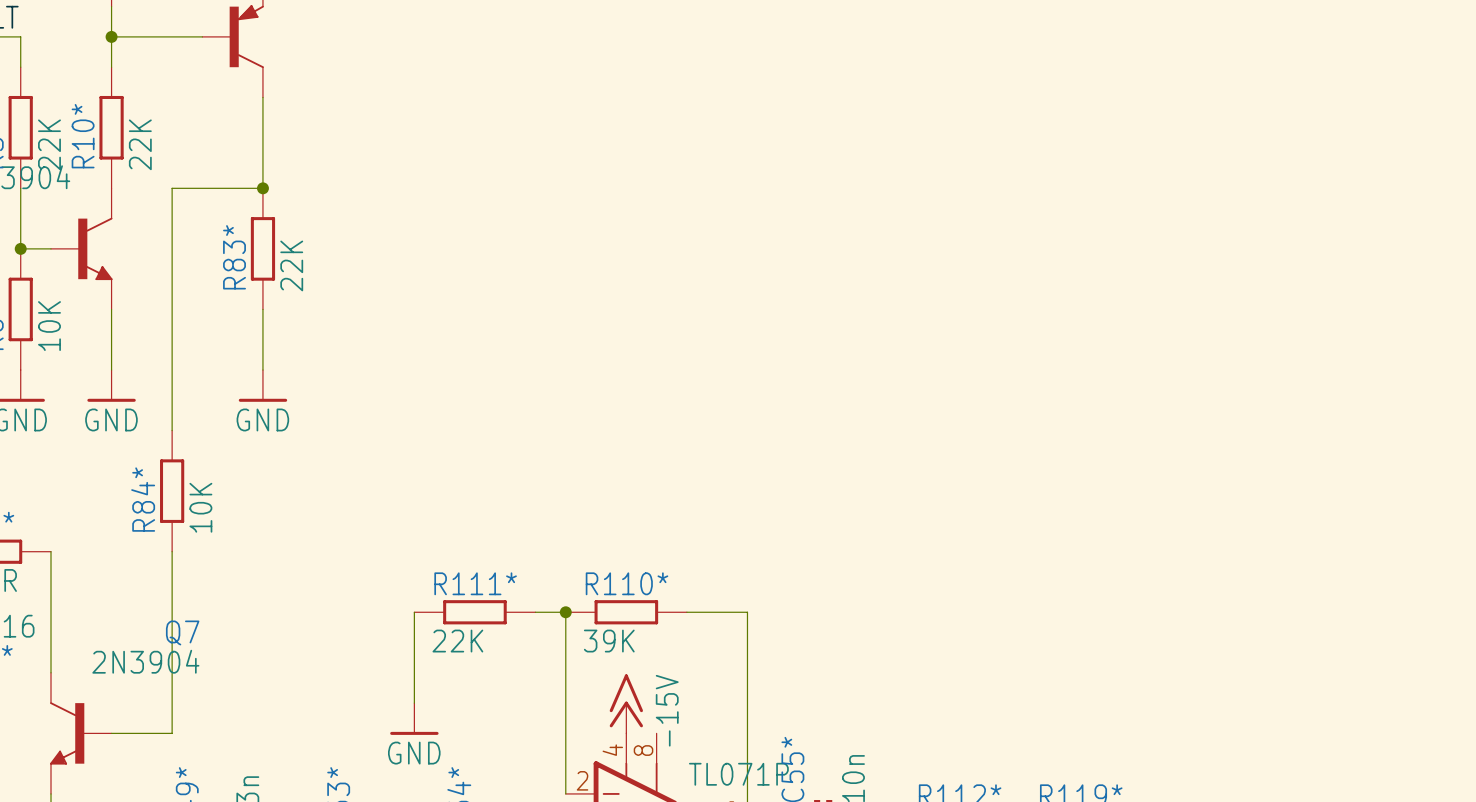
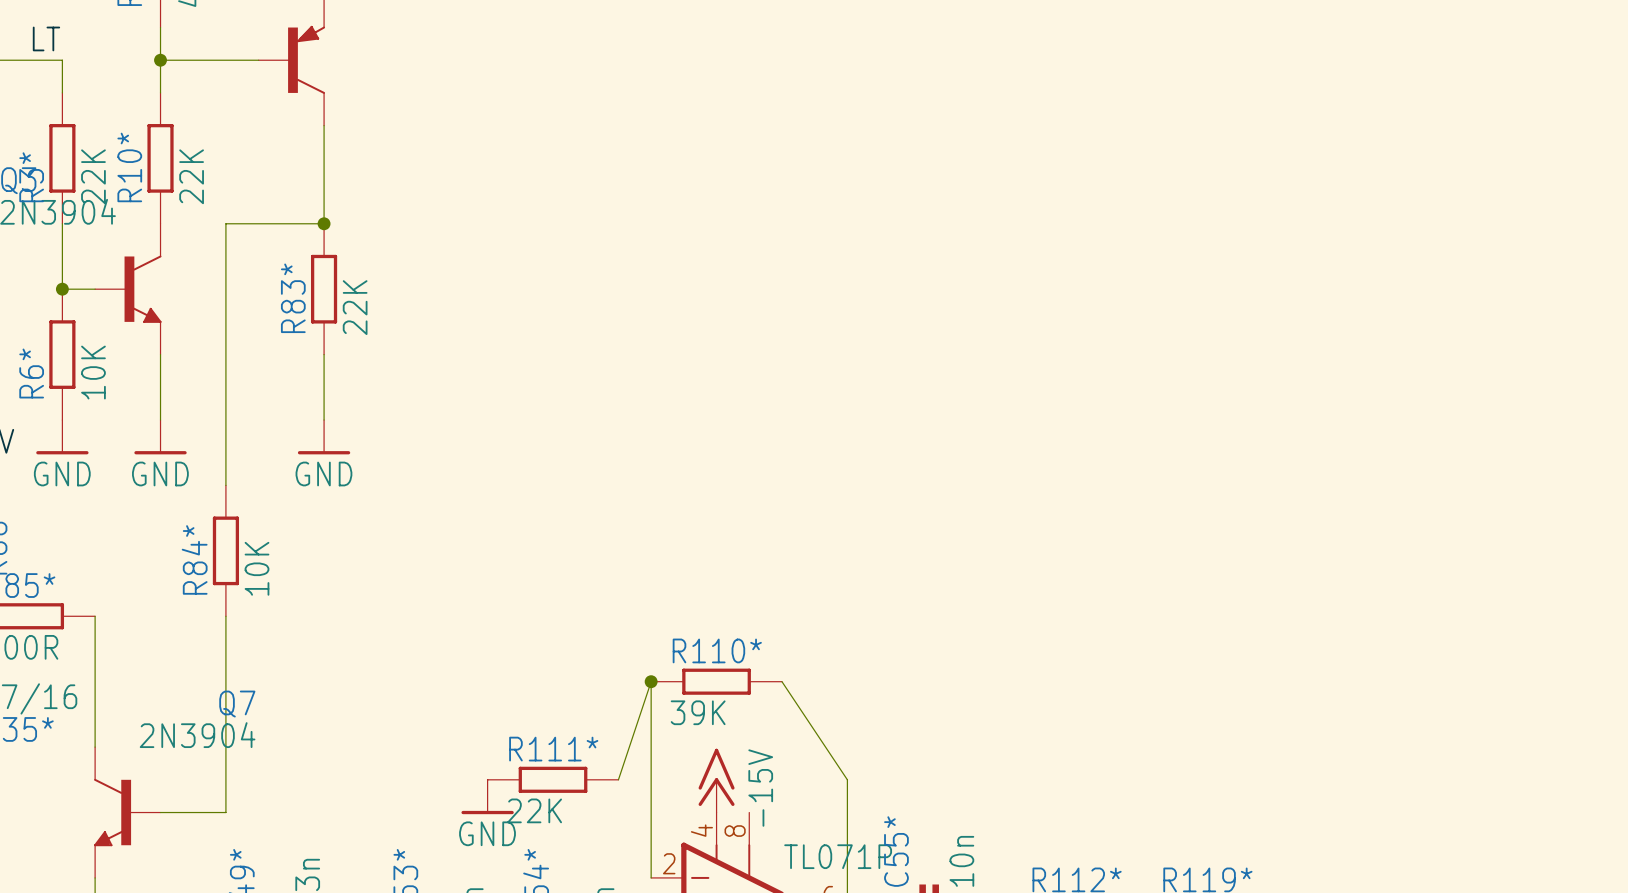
wire: (414, 612) (414, 703) -> none
R111* position: (474, 612) -> (553, 779)
wire: (535, 612) (565, 612) -> (618, 779) (651, 681)
wire: (686, 612) (747, 612) (747, 703) -> (781, 681) (847, 779)

